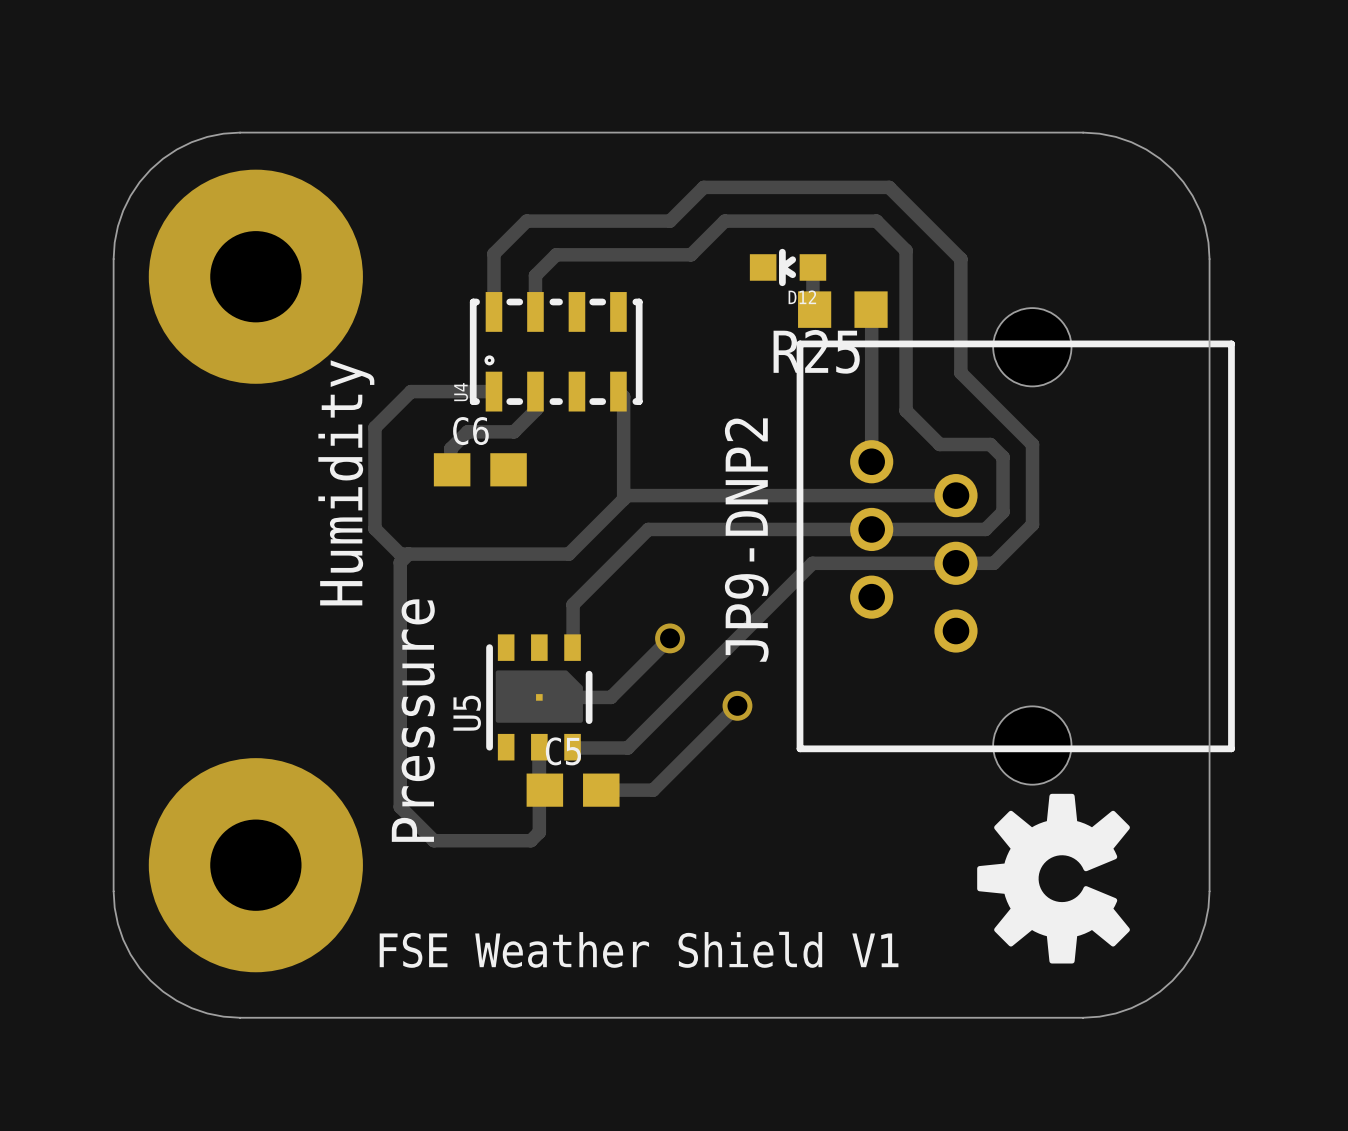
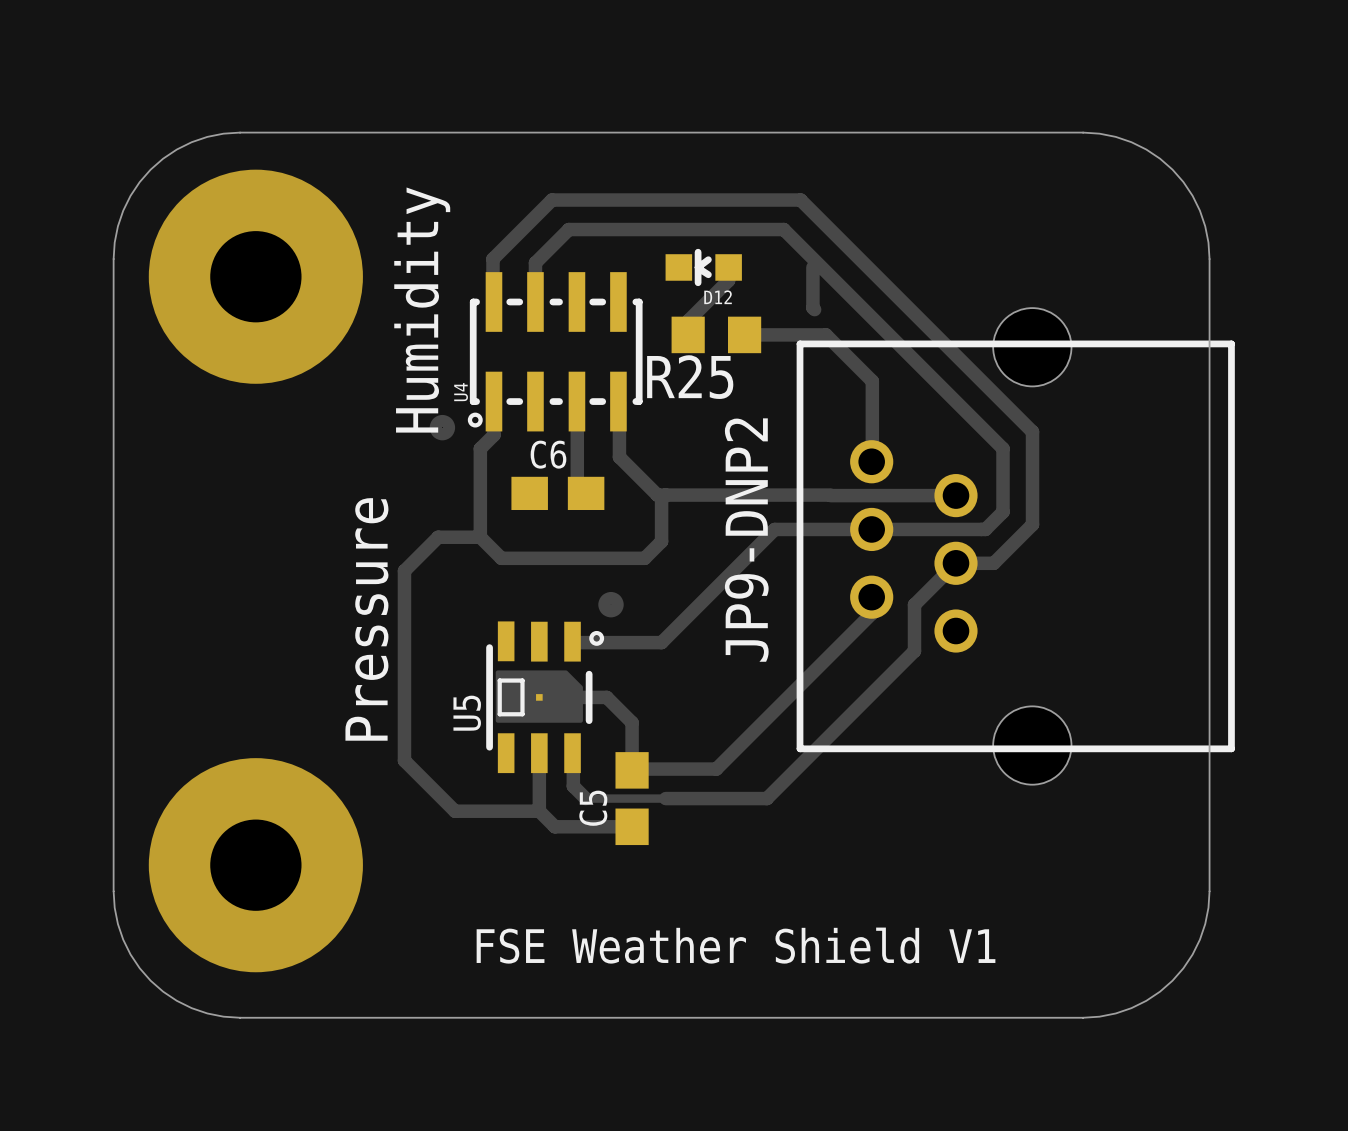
track: none -> (728, 267) (728, 280) (688, 320) (688, 334)
D12 position: (788, 267) -> (703, 267)
track: (535, 275) (556, 254) (691, 254) (724, 221) (876, 221) (906, 250) (906, 410) (939, 444) (990, 444) (1003, 457) -> (535, 275) (535, 262) (568, 229) (783, 229) (1003, 448) (1003, 457)
U4 footprint: [469, 292, 643, 412] -> [467, 272, 643, 432]
R25 position: (842, 309) -> (716, 334)
track: (871, 309) (871, 461) -> (744, 334) (825, 334) (872, 381) (871, 461)
track: (493, 311) (493, 253) (526, 221) (670, 221) (703, 187) (889, 187) (960, 259) (960, 372) (1032, 444) -> (493, 301) (492, 259) (551, 200) (800, 200) (1032, 431) (1032, 444)
track: (493, 391) (411, 391) (374, 427) (374, 528) (400, 554) (568, 554) (627, 495) (830, 495) -> (618, 401) (619, 457) (657, 495) (830, 495)
track: (535, 391) (536, 409) (514, 431) (467, 431) (450, 448) (452, 469) -> none
track: (618, 391) (623, 396) (623, 499) -> none
track: none -> (493, 401) (493, 435) (480, 448) (480, 537)
track: none -> (577, 401) (577, 484) (586, 493)
drawing: none -> [429, 414, 456, 441]
C6 position: (480, 469) -> (557, 493)
text position: Humidity (346, 482) -> Humidity (422, 310)
track: none -> (665, 495) (661, 499) (661, 541) (644, 558) (501, 558) (480, 537)
track: (774, 529) (648, 529) (573, 604) (572, 647) -> (774, 529) (661, 642) (572, 641)
track: none -> (480, 537) (438, 537) (404, 570) (404, 760) (455, 811) (539, 811) (554, 826) (632, 826)
track: (408, 554) (400, 562) (400, 807) (433, 840) (530, 840) (539, 832) (539, 811) -> none
track: (955, 563) (812, 563) (627, 747) (572, 747) -> (955, 563) (914, 604) (914, 651) (766, 798) (585, 798) (573, 786) (573, 747)
drawing: none -> [598, 591, 624, 618]
U5 footprint: [486, 634, 593, 761] -> [486, 621, 605, 774]
track: (670, 638) (611, 697) (606, 697) -> (871, 597) (871, 613) (716, 769) (632, 770) (632, 722) (606, 697)
via: (670, 638) -> none
track: (737, 705) (653, 790) (601, 790) -> none
via: (737, 705) -> none
text position: Pressure (413, 720) -> Pressure (366, 619)
C5 rotation: 0° (573, 790) -> 90° clockwise (632, 798)
C5 position: (573, 790) -> (632, 798)
drawing: [977, 793, 1130, 964] -> none
text position: FSE Weather Shield V1 (639, 949) -> FSE Weather Shield V1 (736, 945)

